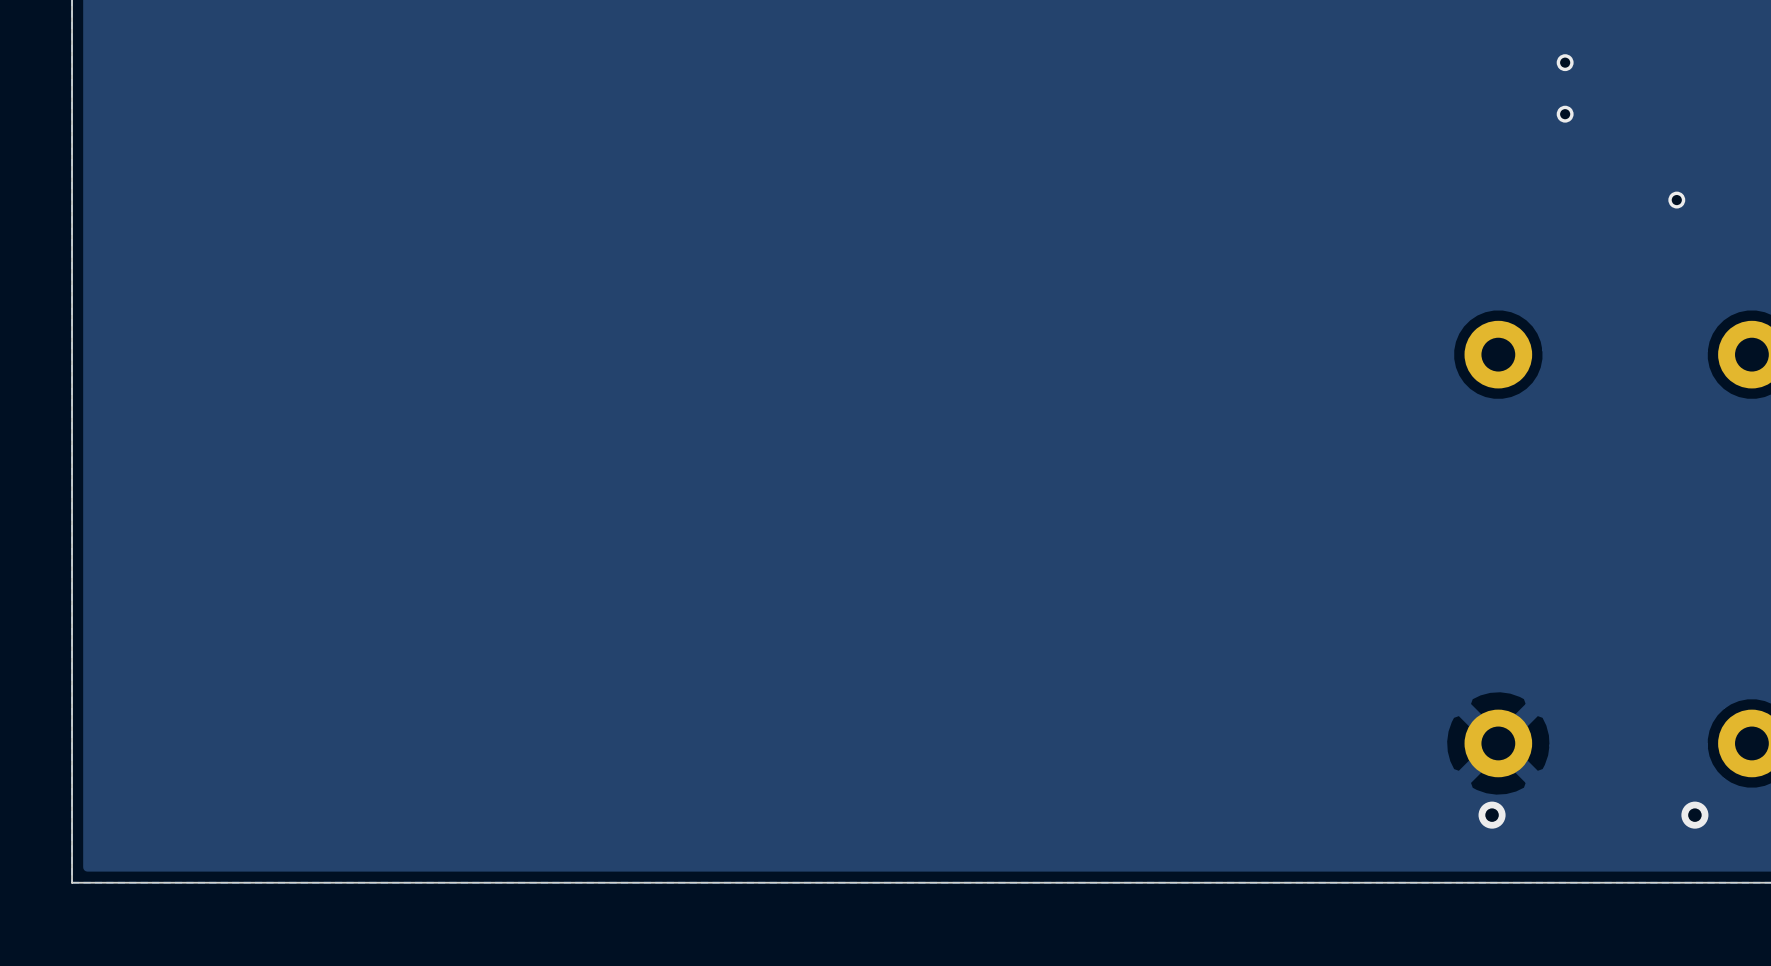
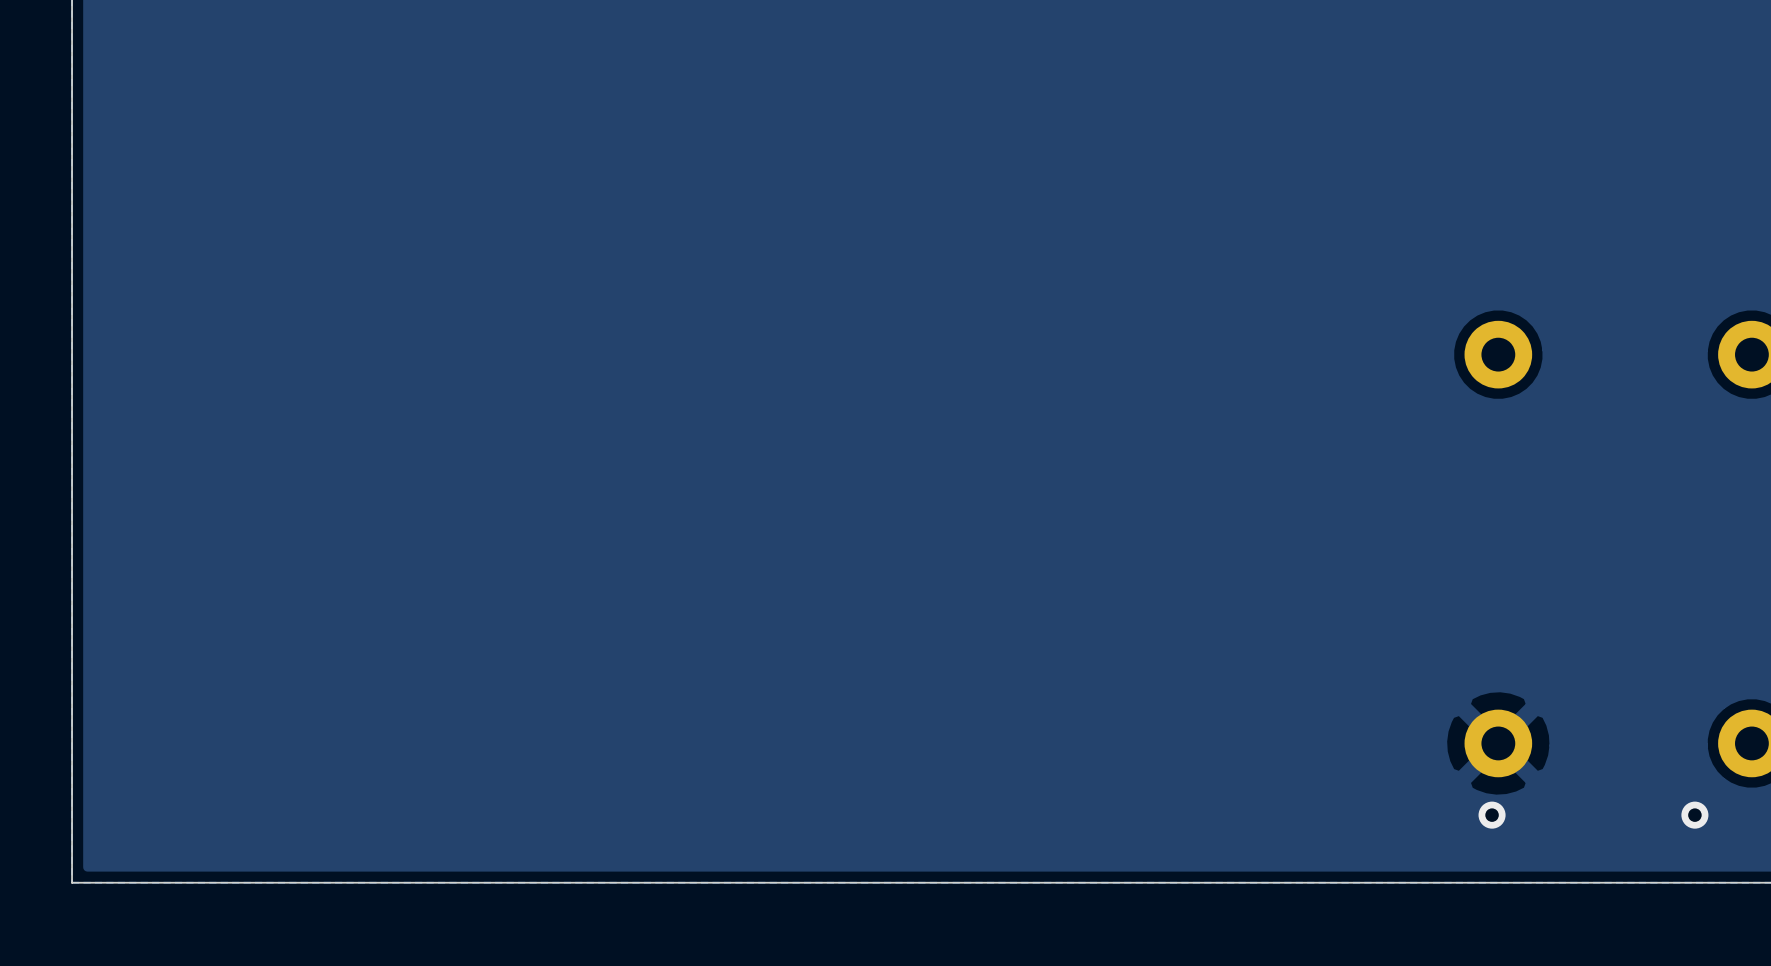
via: (1565, 62) -> none
via: (1565, 114) -> none
via: (1676, 200) -> none

